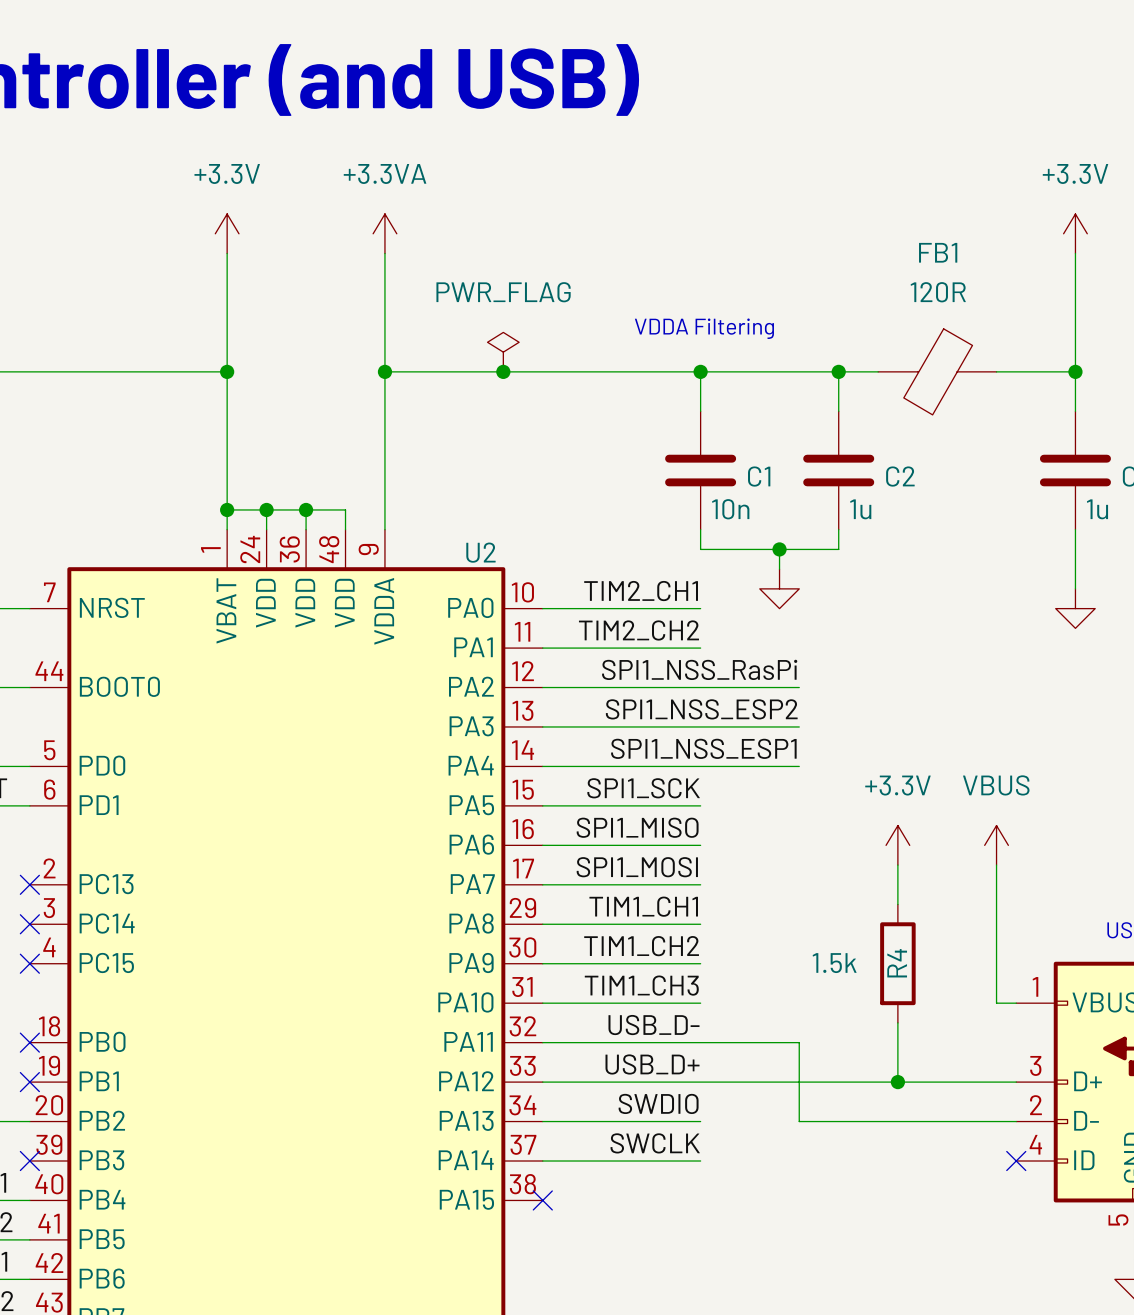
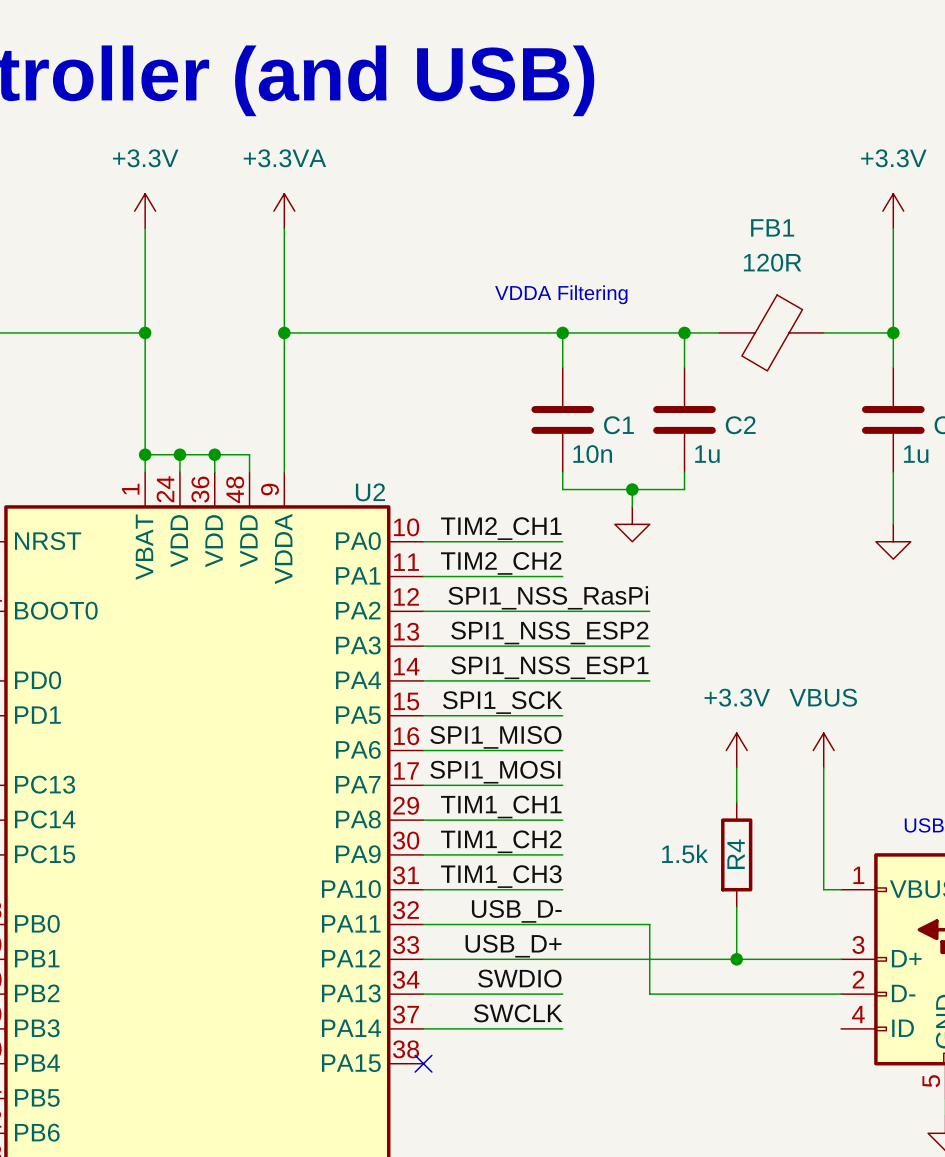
power symbol: PWR_FLAG (503, 352) -> none
junction: (503, 371) -> none
no-connect mark: (1016, 1161) -> none

